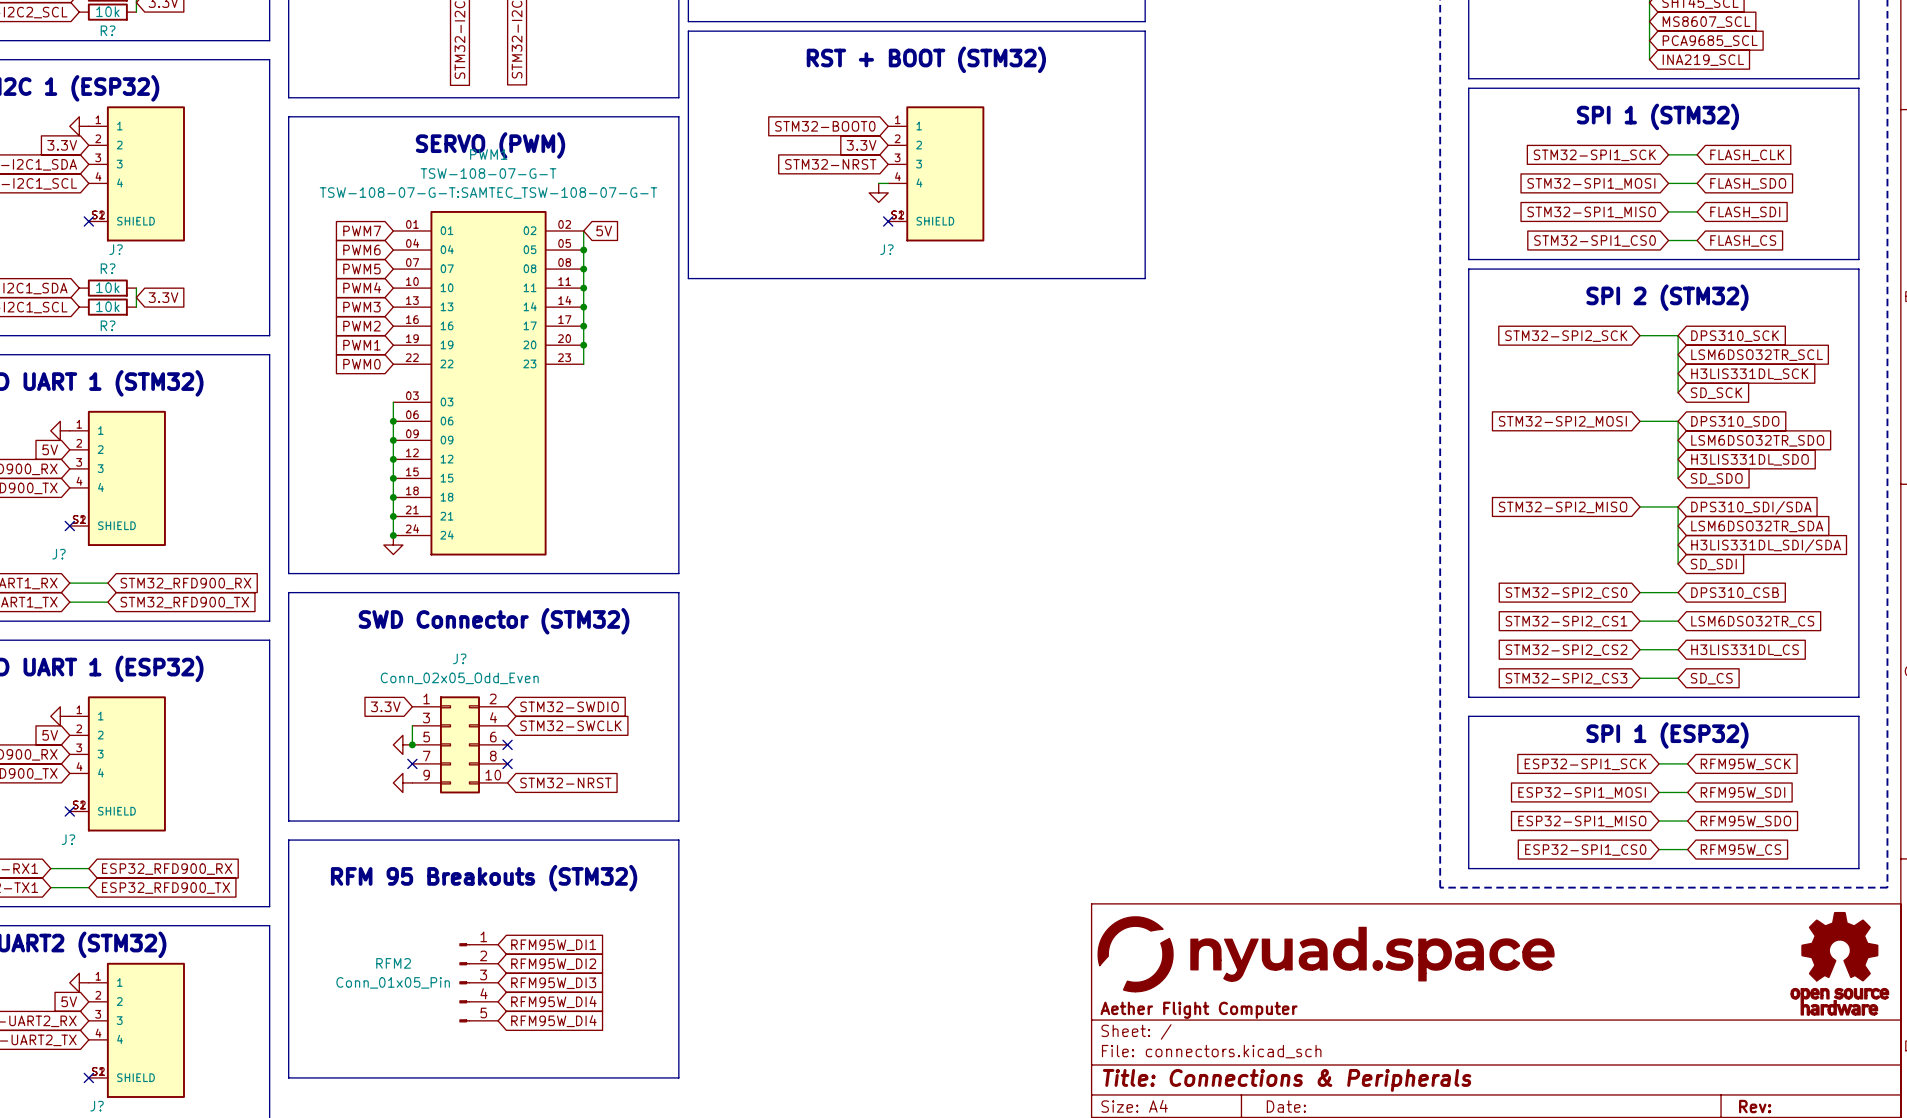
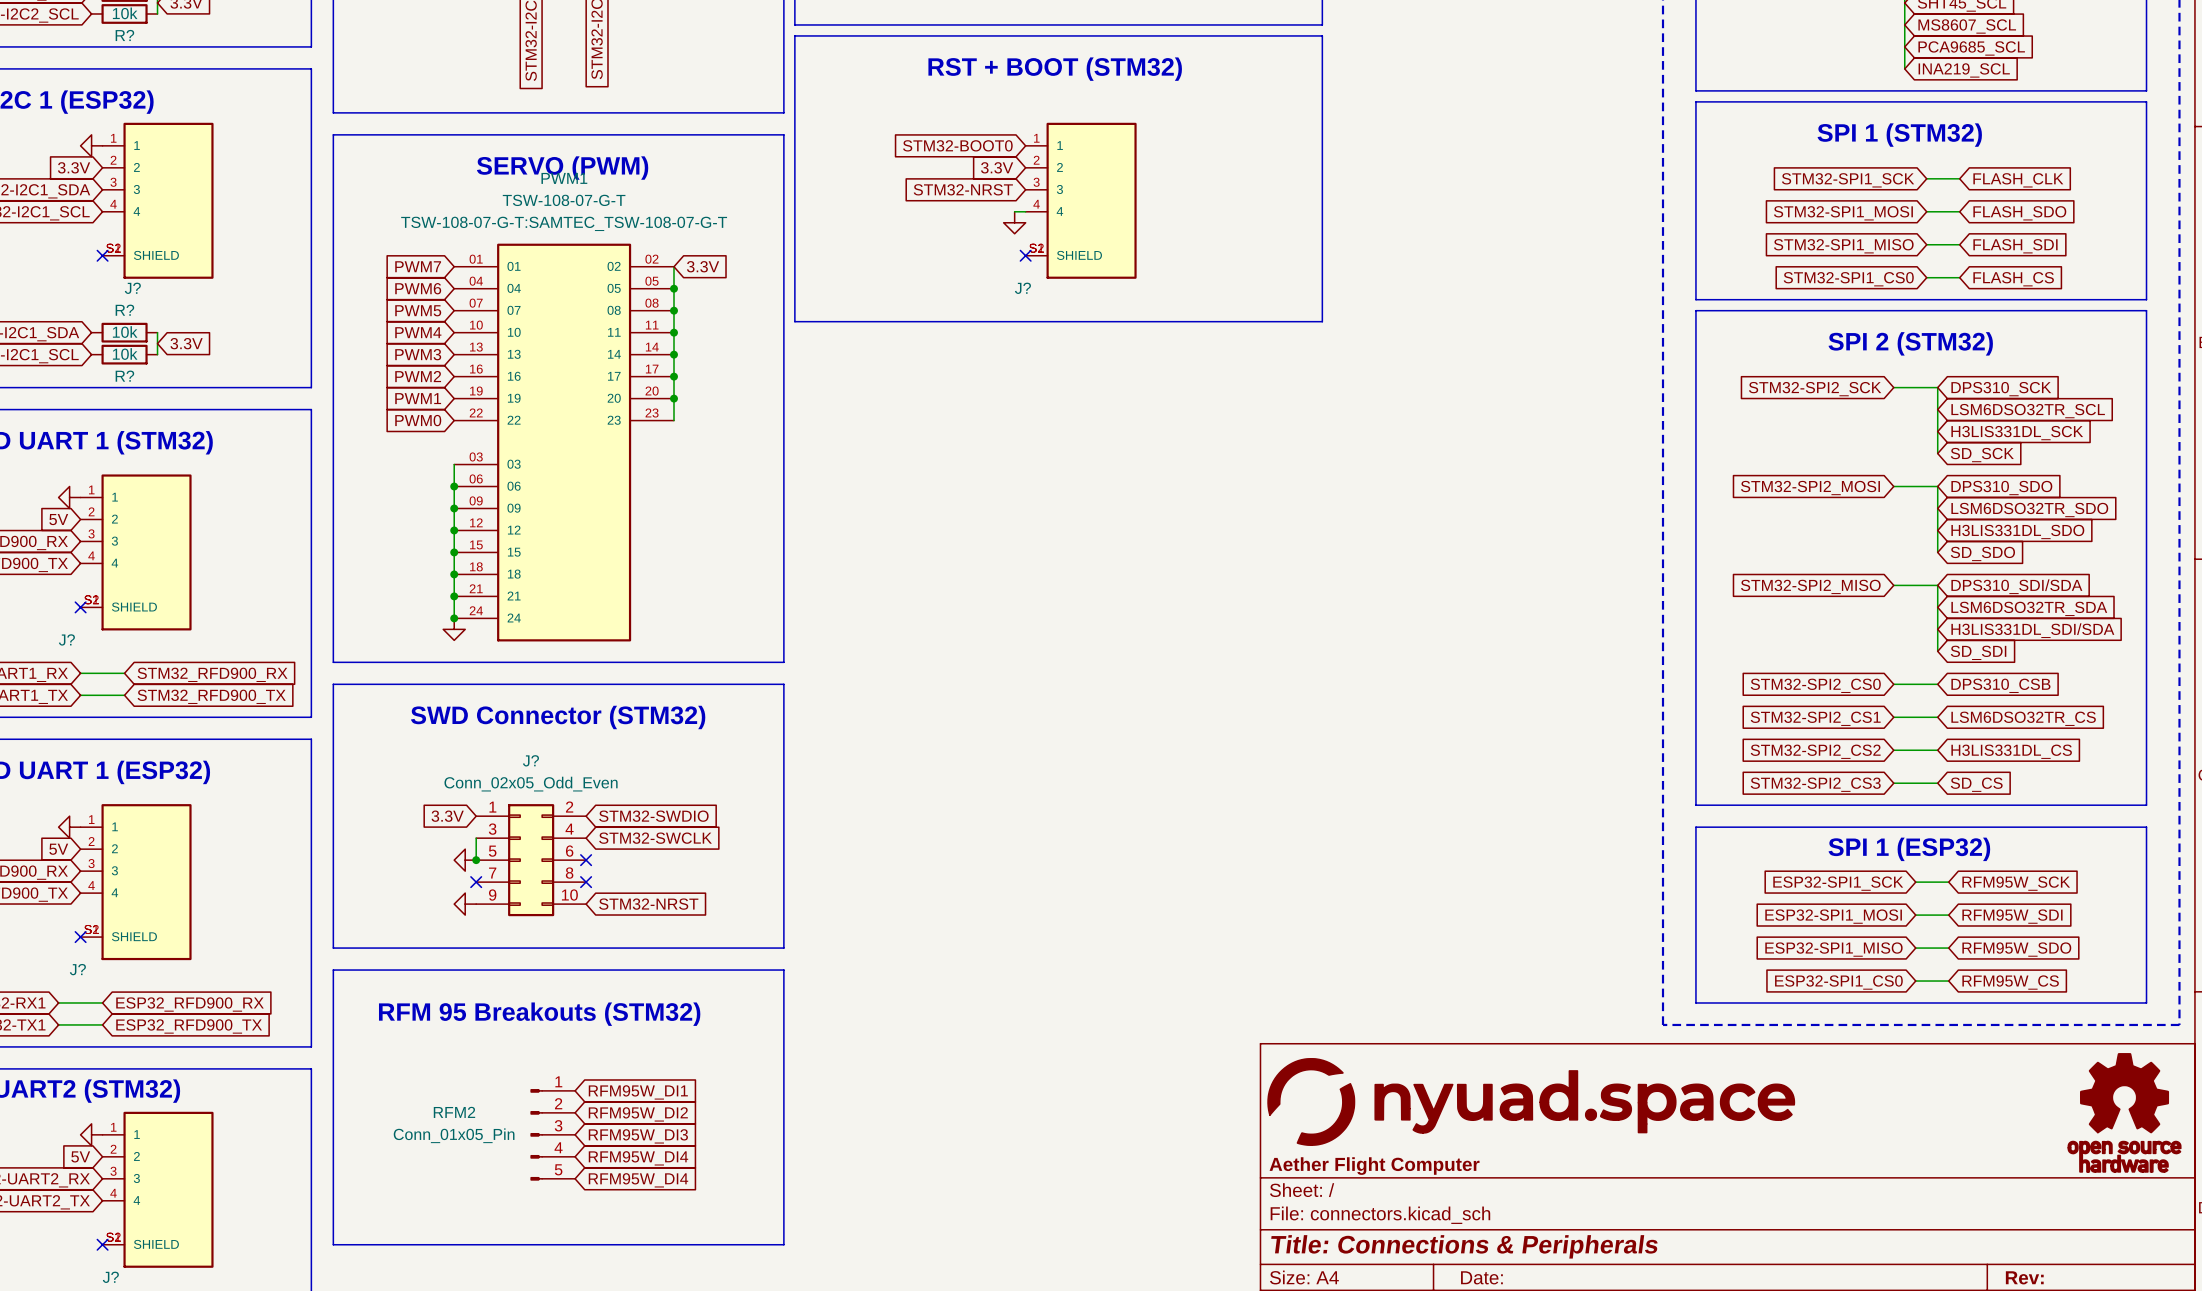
global label: 5V (604, 230) -> 3.3V (703, 266)

